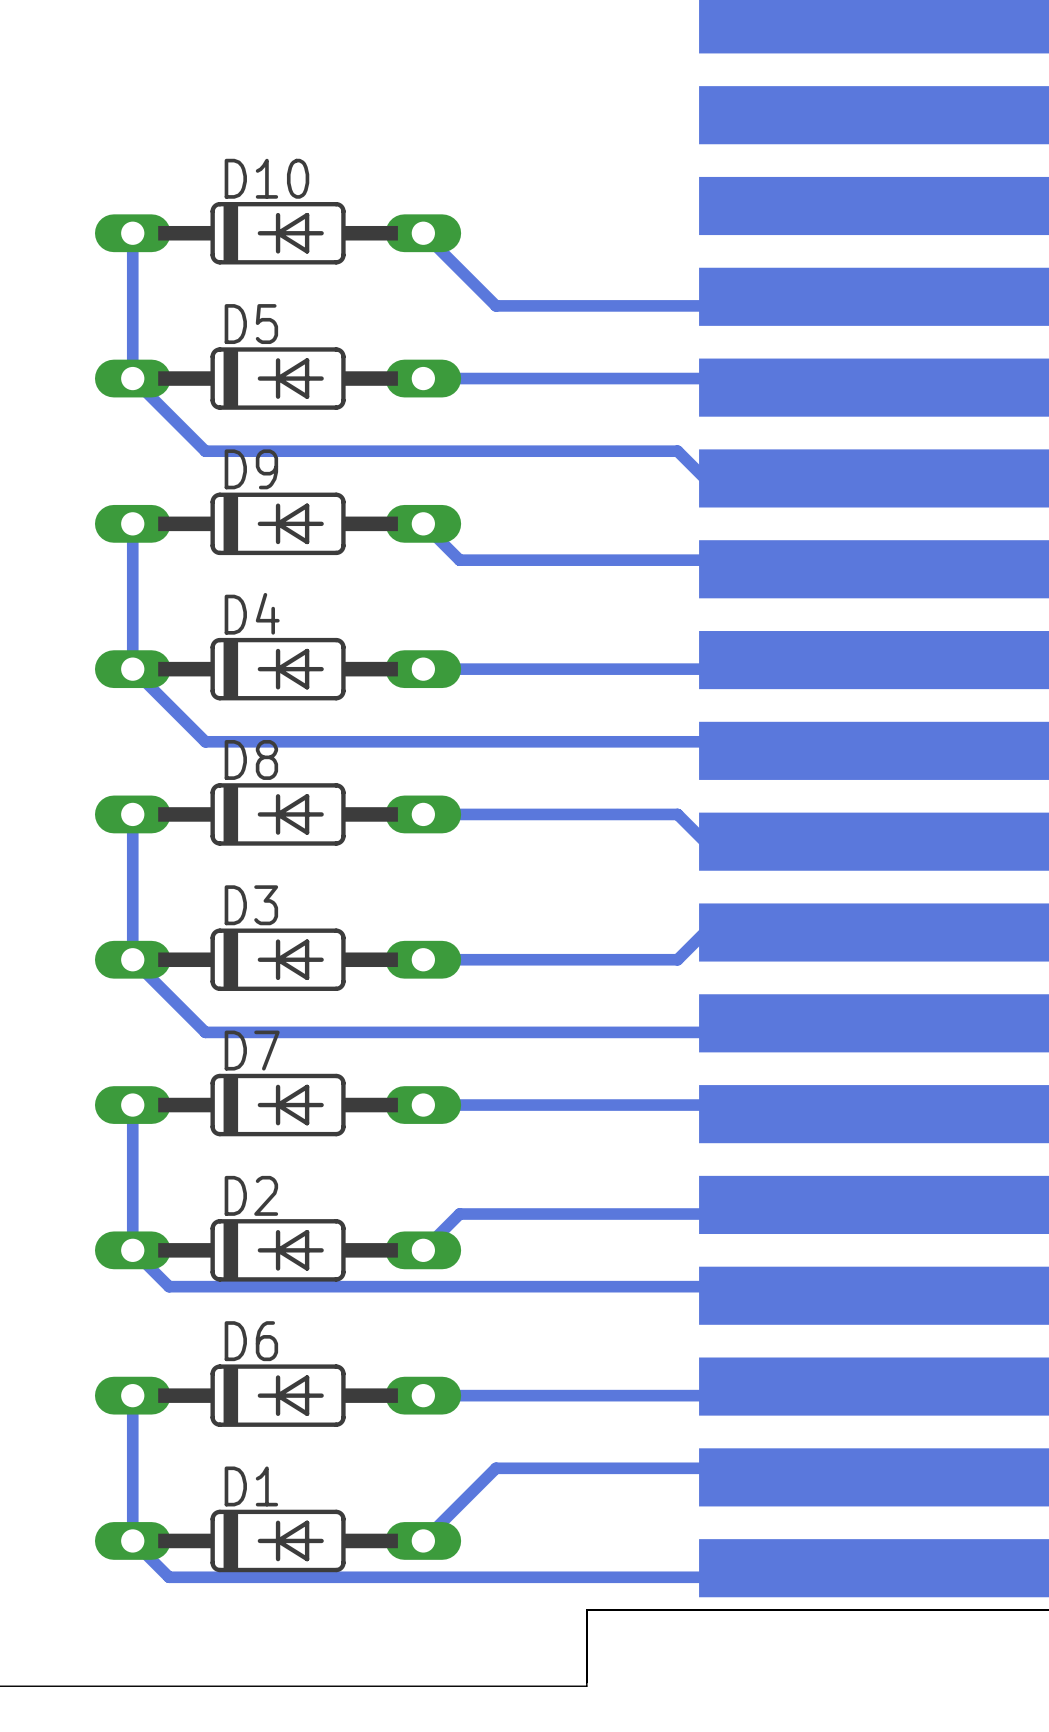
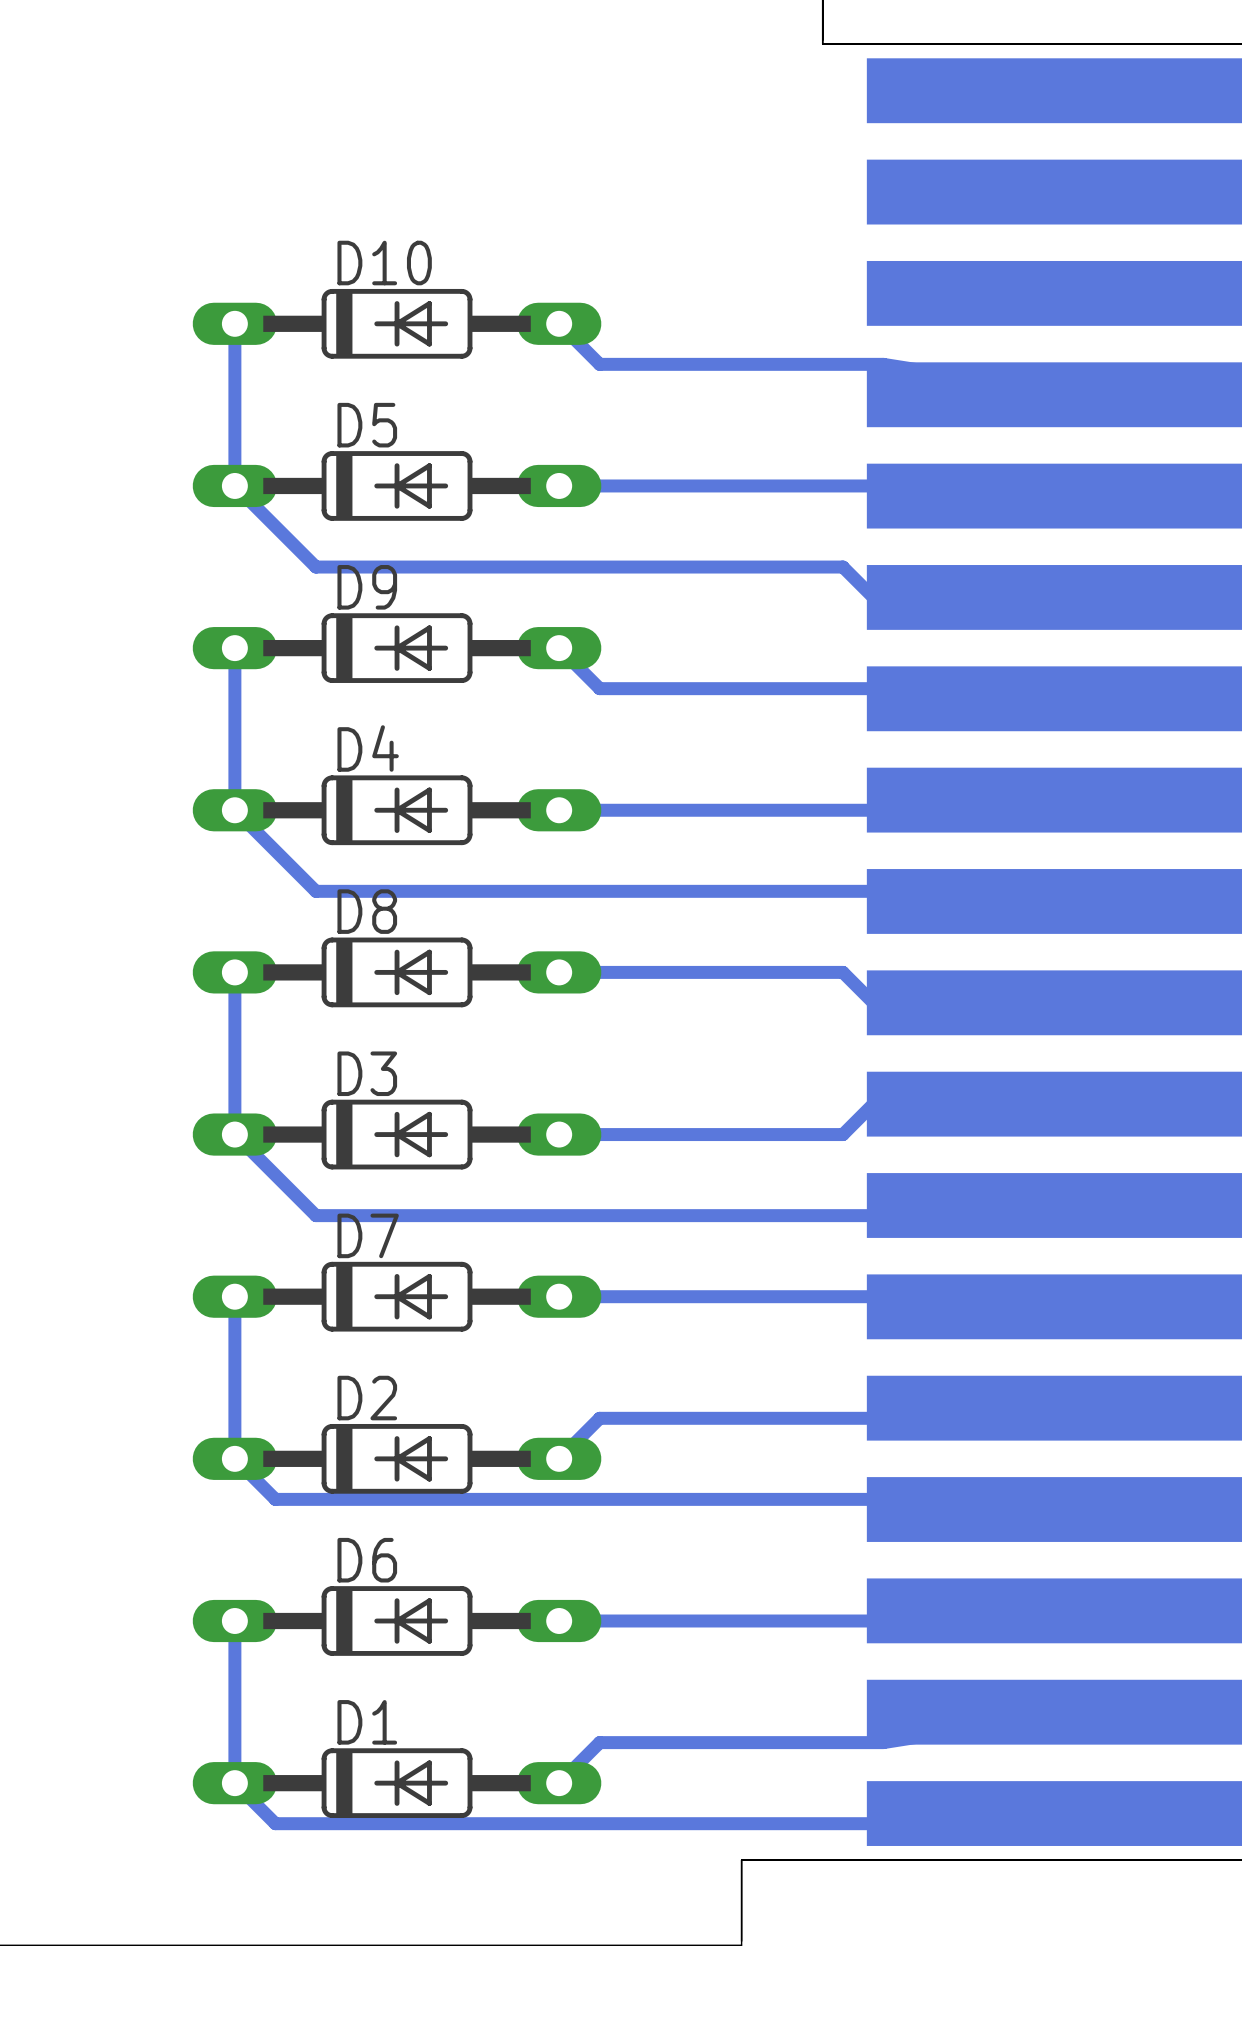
bottom track: (459, 269) (496, 305) (750, 305) (886, 296) -> (599, 364) (883, 364) (1076, 394)
bottom track: (886, 1477) (750, 1468) (496, 1468) (459, 1504) -> (1076, 1712) (883, 1742) (599, 1742)

